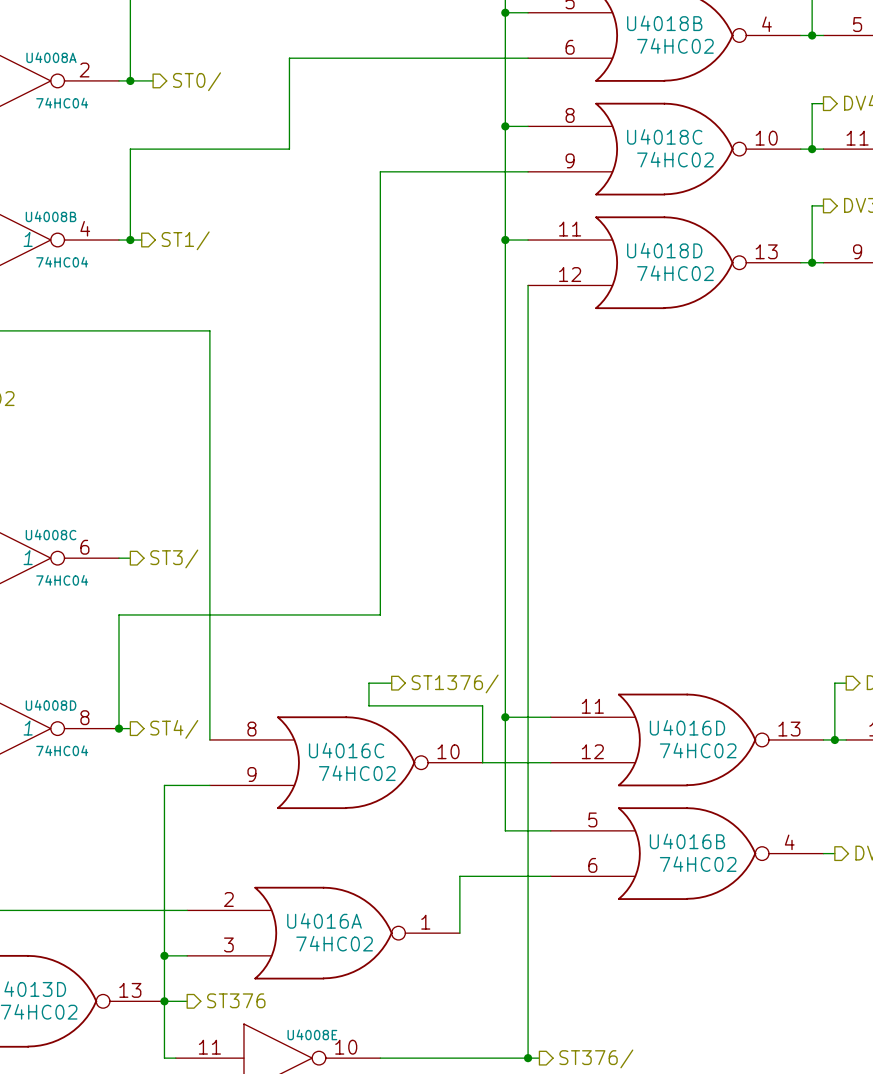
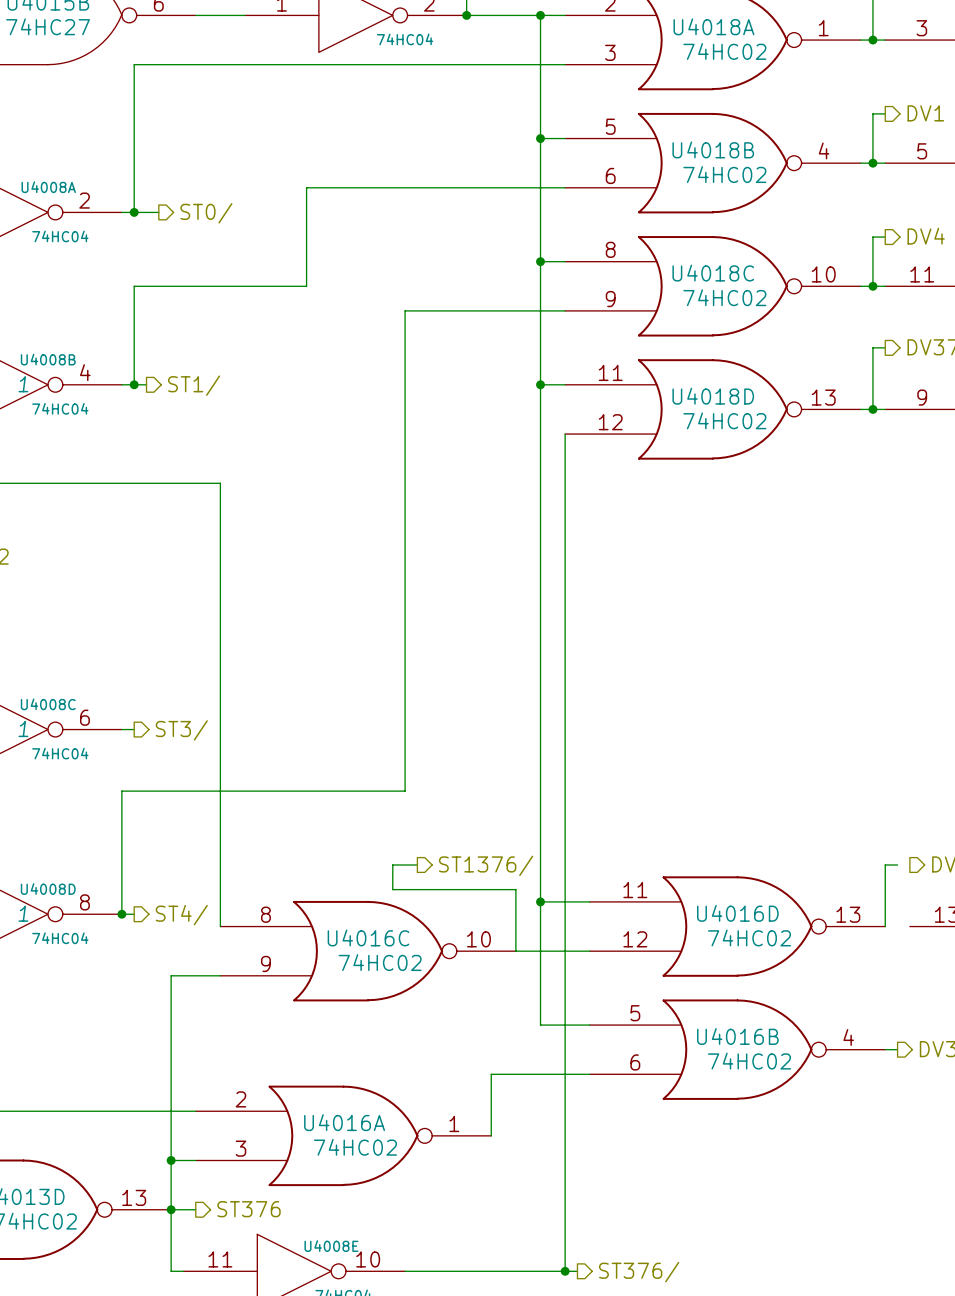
wire: (846, 683) (834, 683) (834, 739) -> none
wire: (823, 739) (846, 739) -> (885, 926) (885, 864) (897, 864)
junction: (834, 739) -> none

